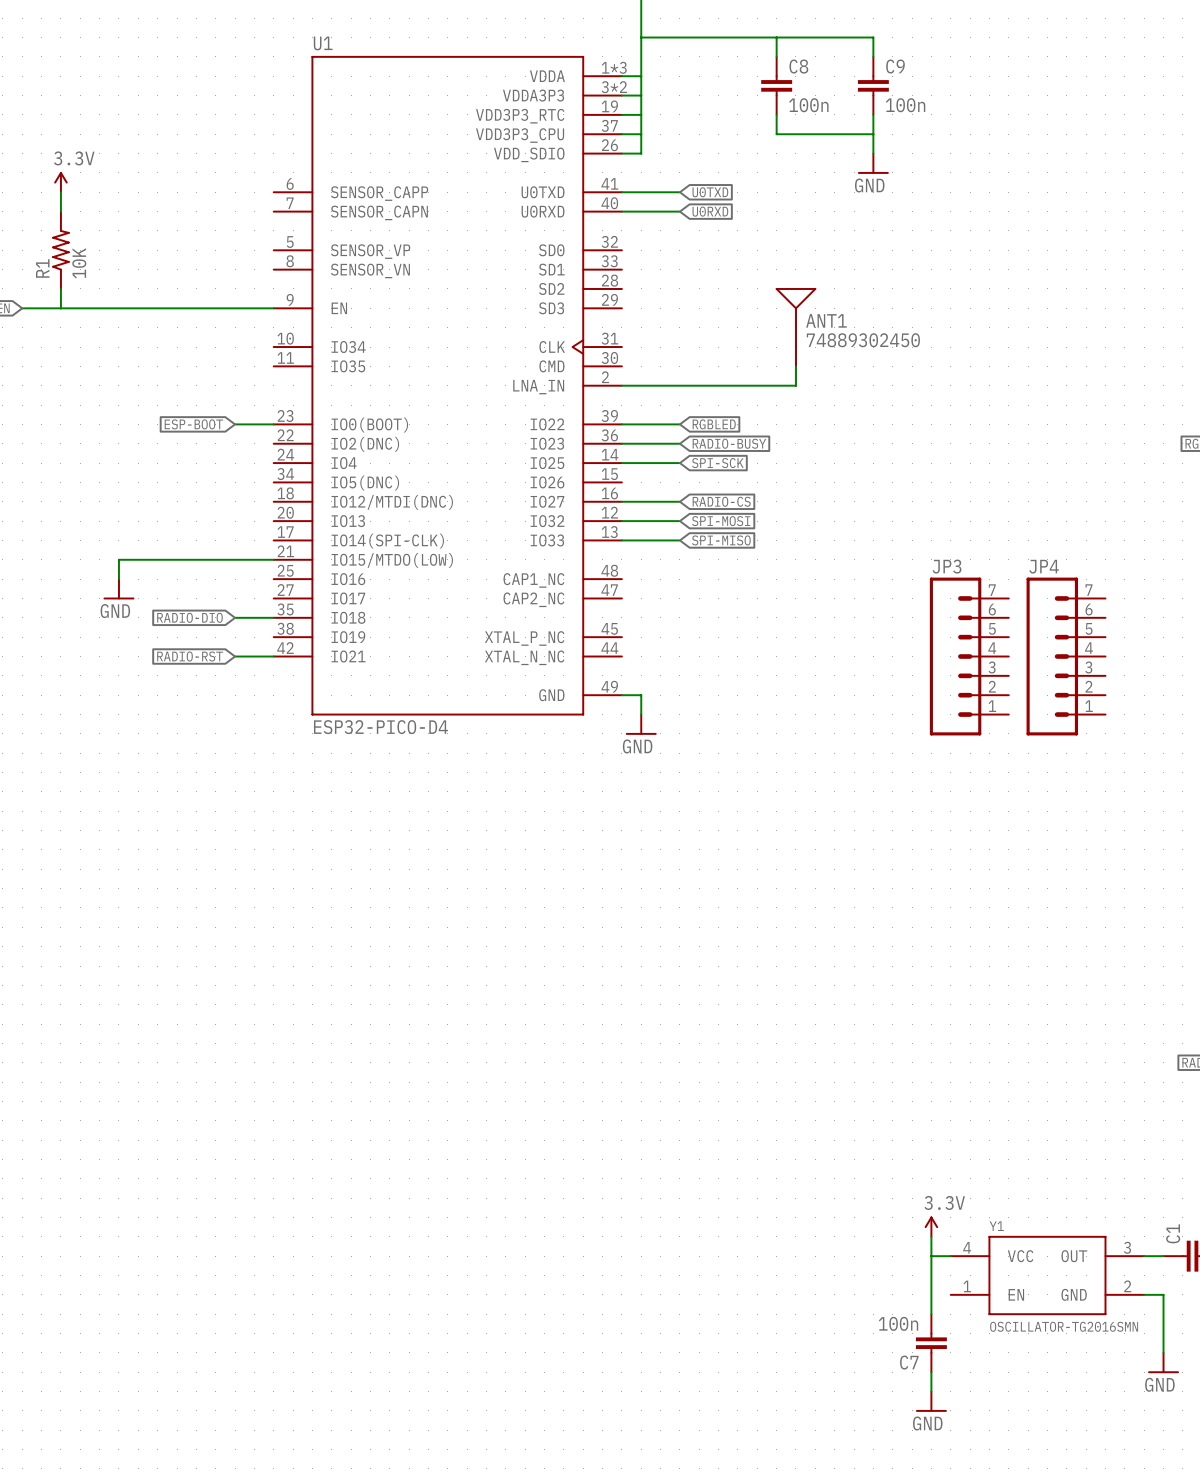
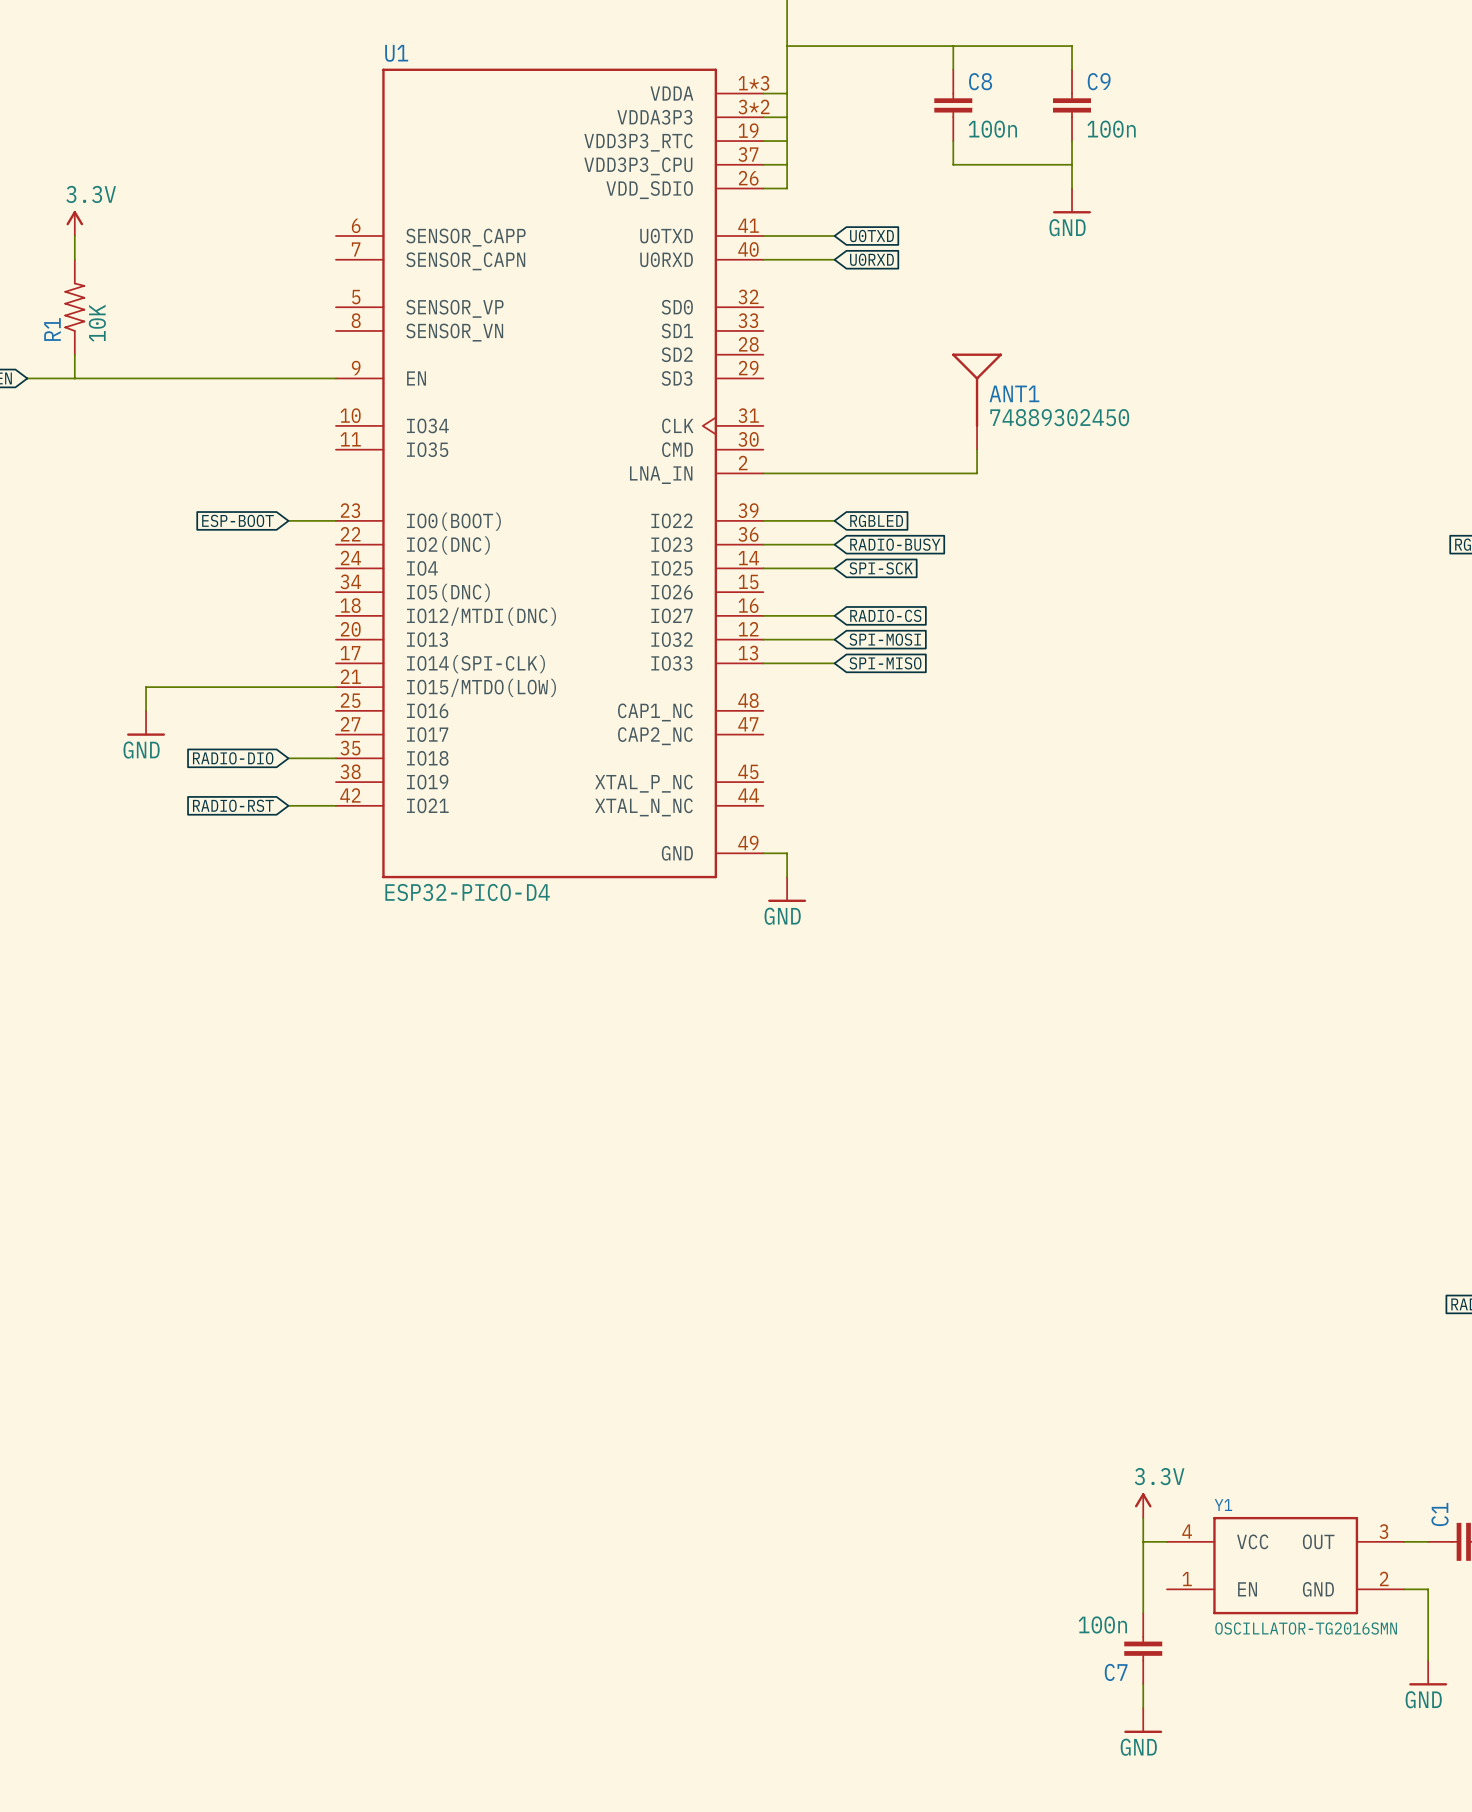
JP3: (969, 656) -> none
JP4: (1066, 656) -> none

